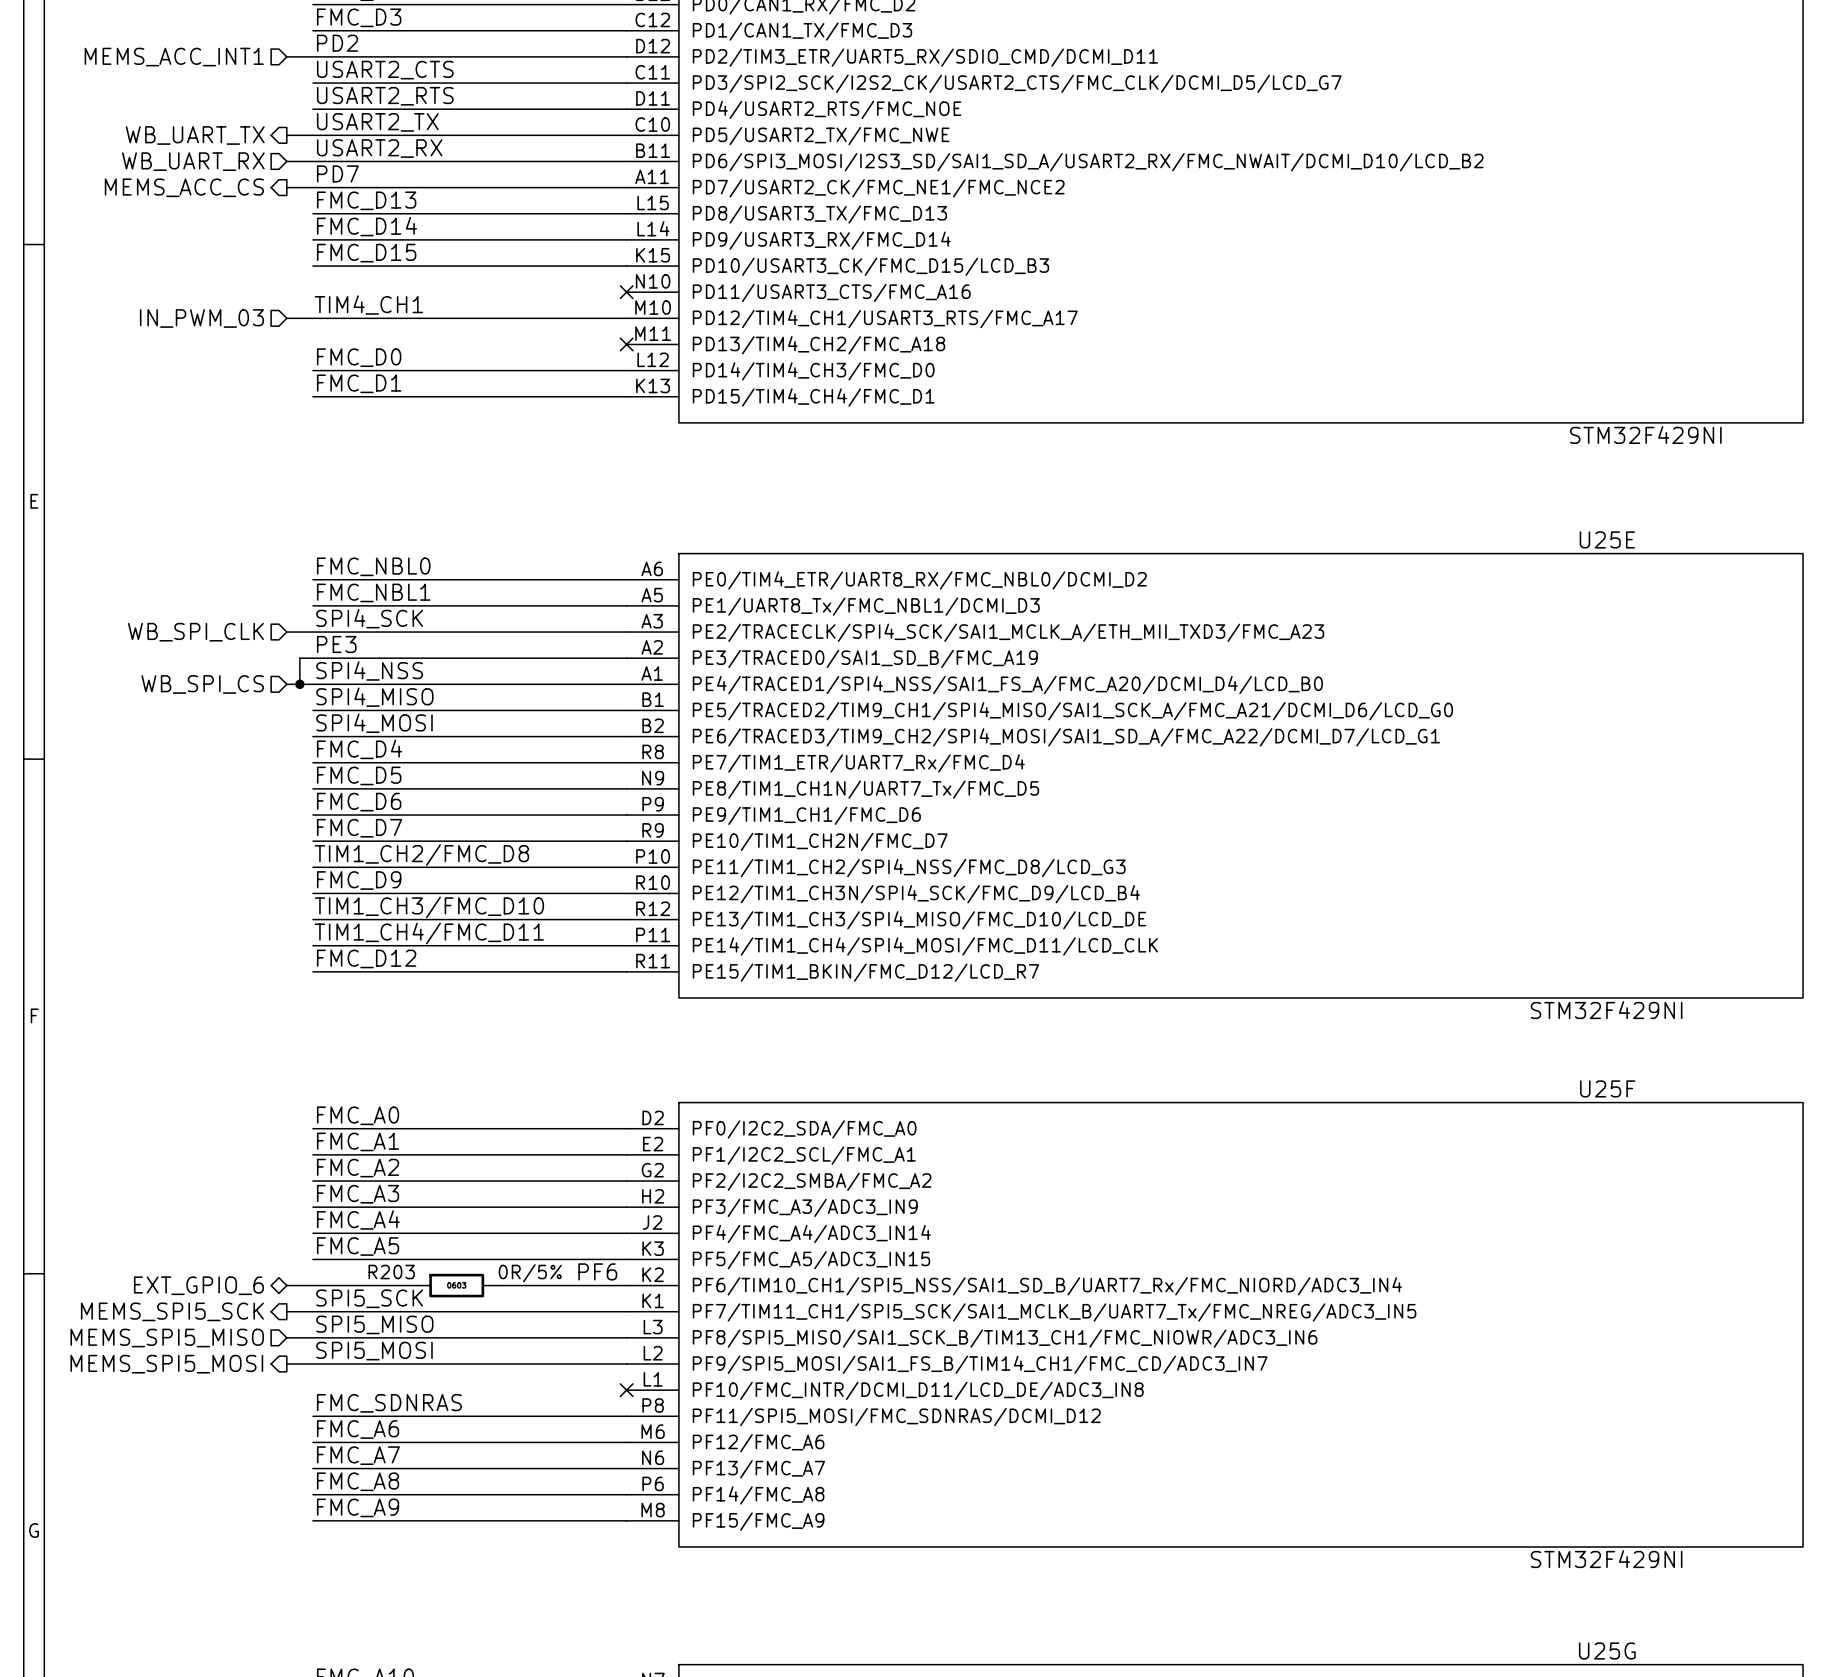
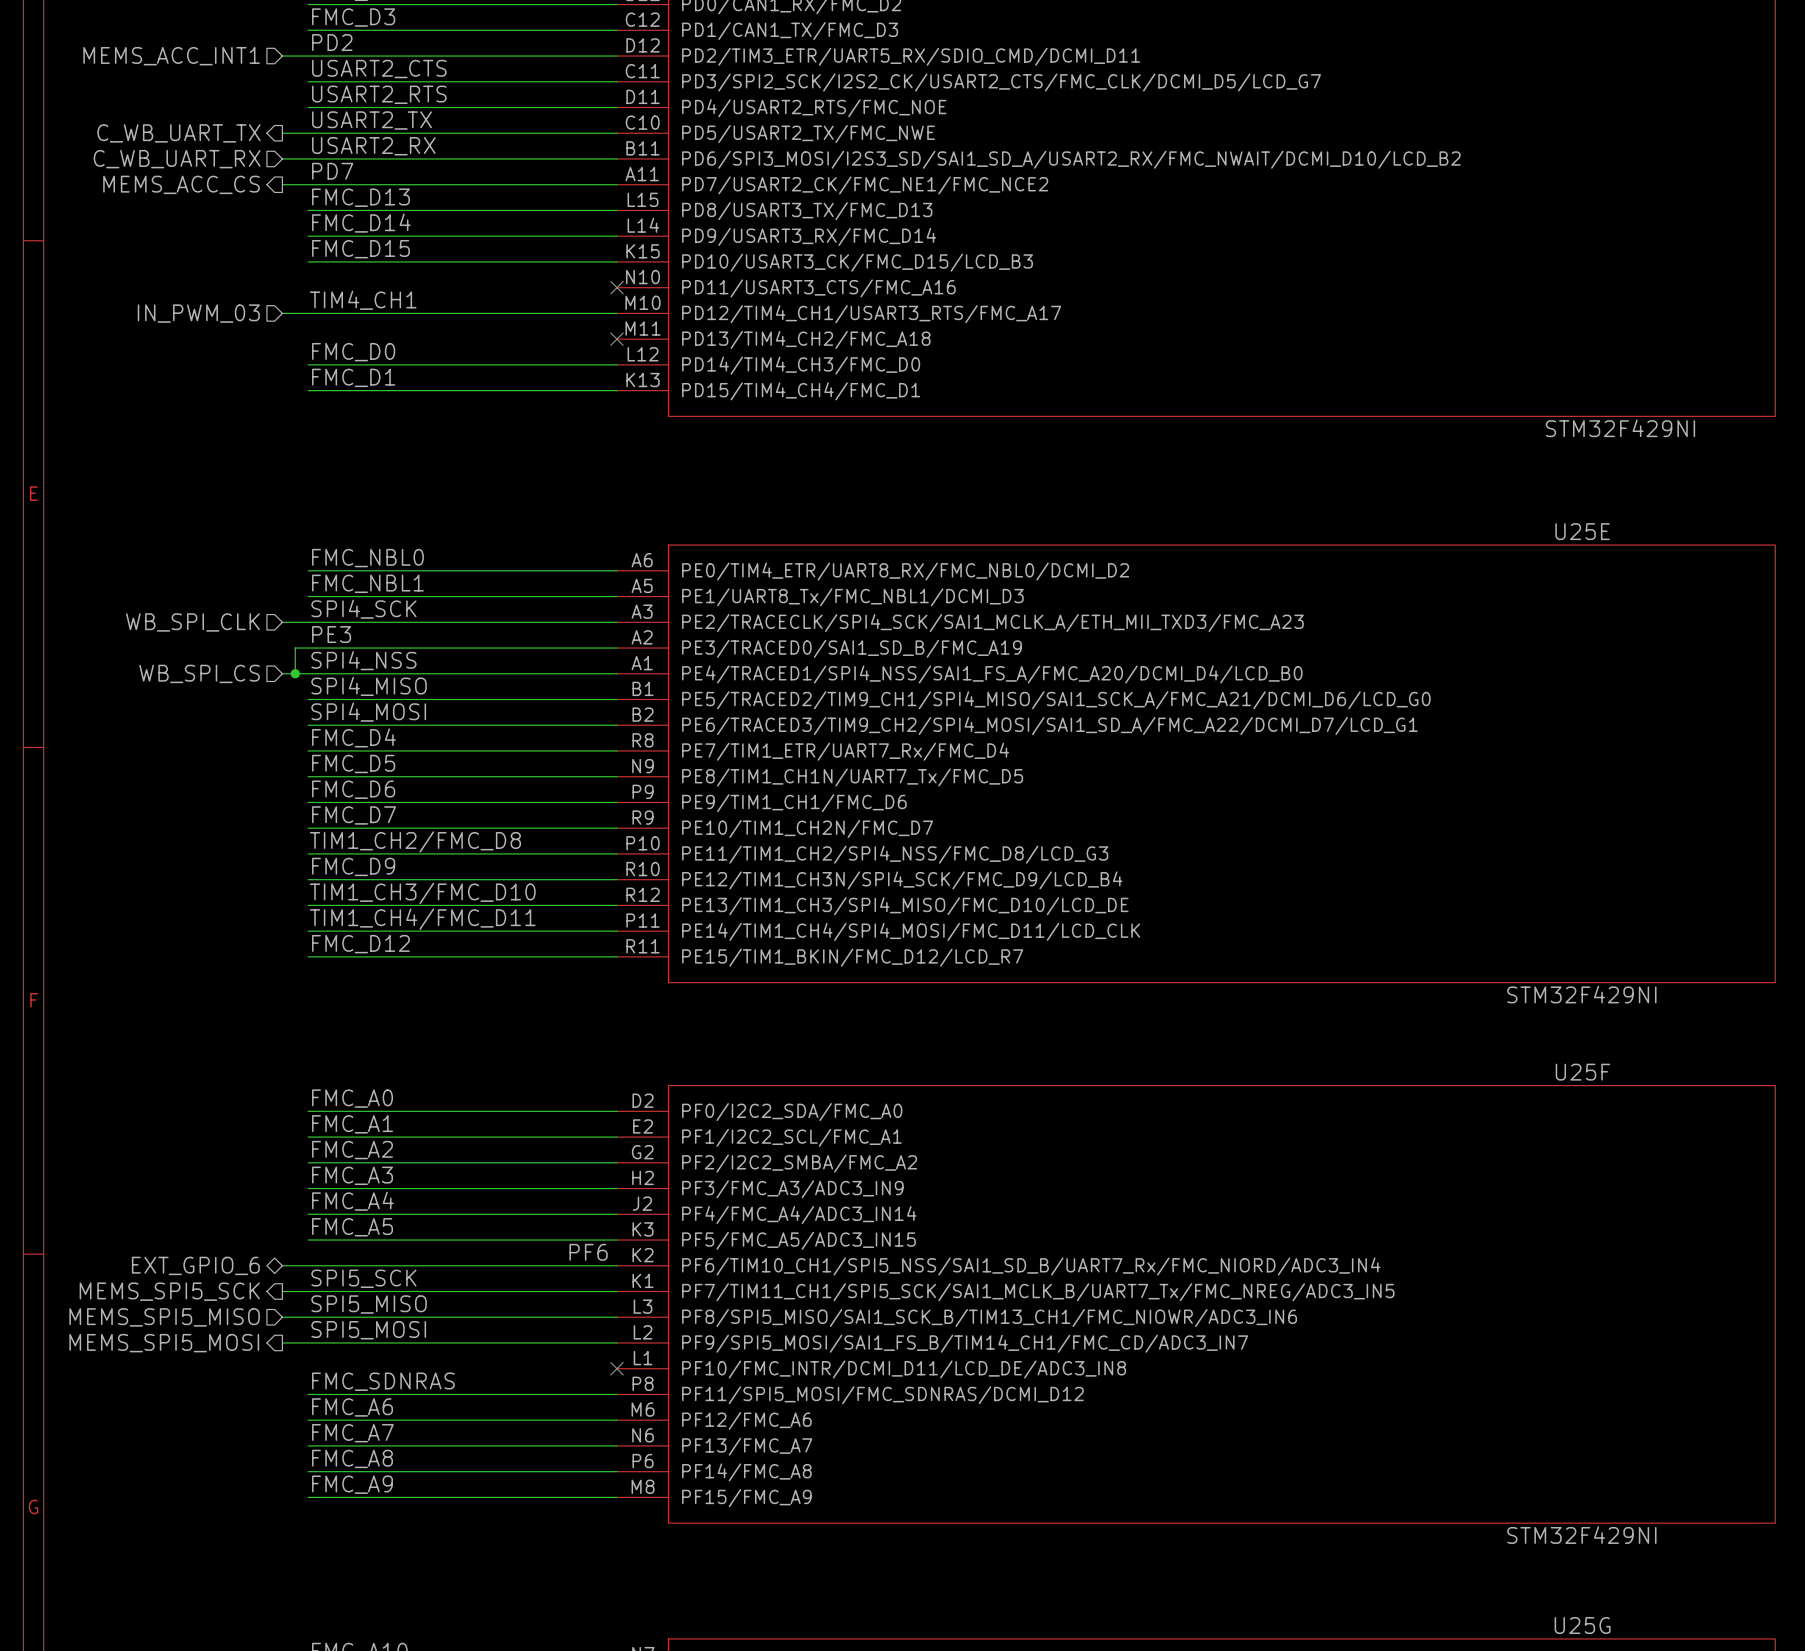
hierarchical label: WB_UART_TX (195, 135) -> C_WB_UART_TX (178, 133)
hierarchical label: WB_UART_RX (193, 161) -> C_WB_UART_RX (177, 159)
wire: none -> (411, 1265) (488, 1265)
R203: 0R/5% (456, 1285) -> none

